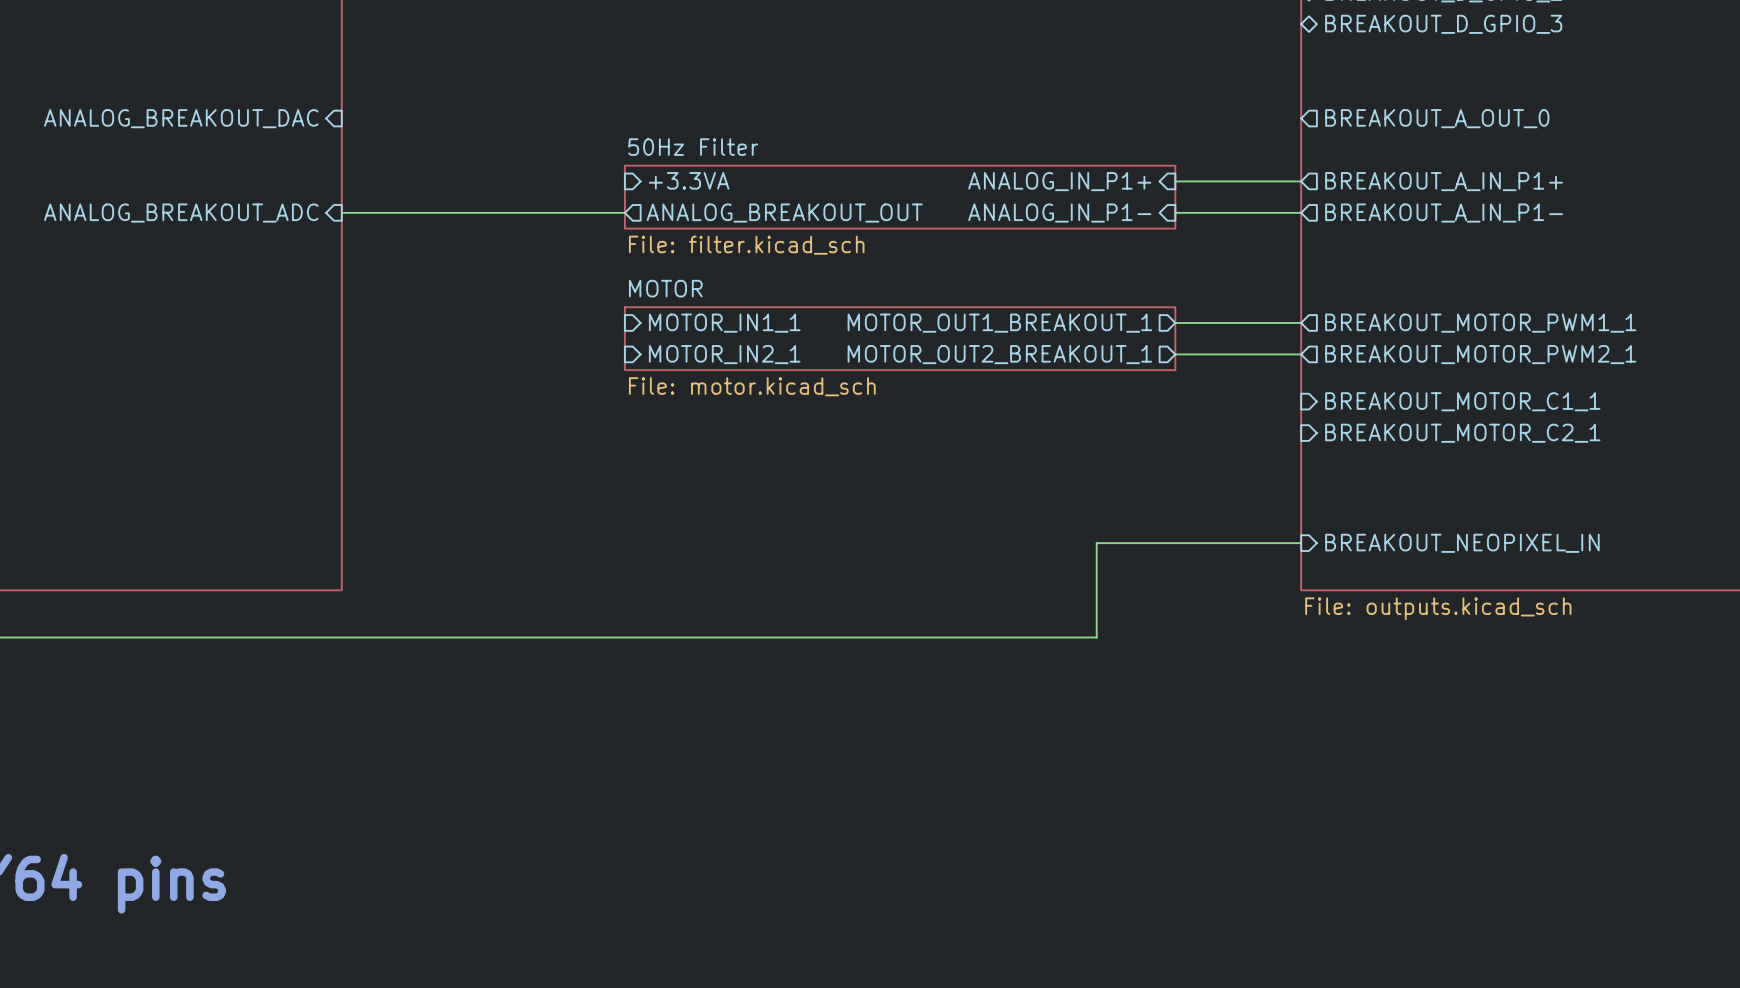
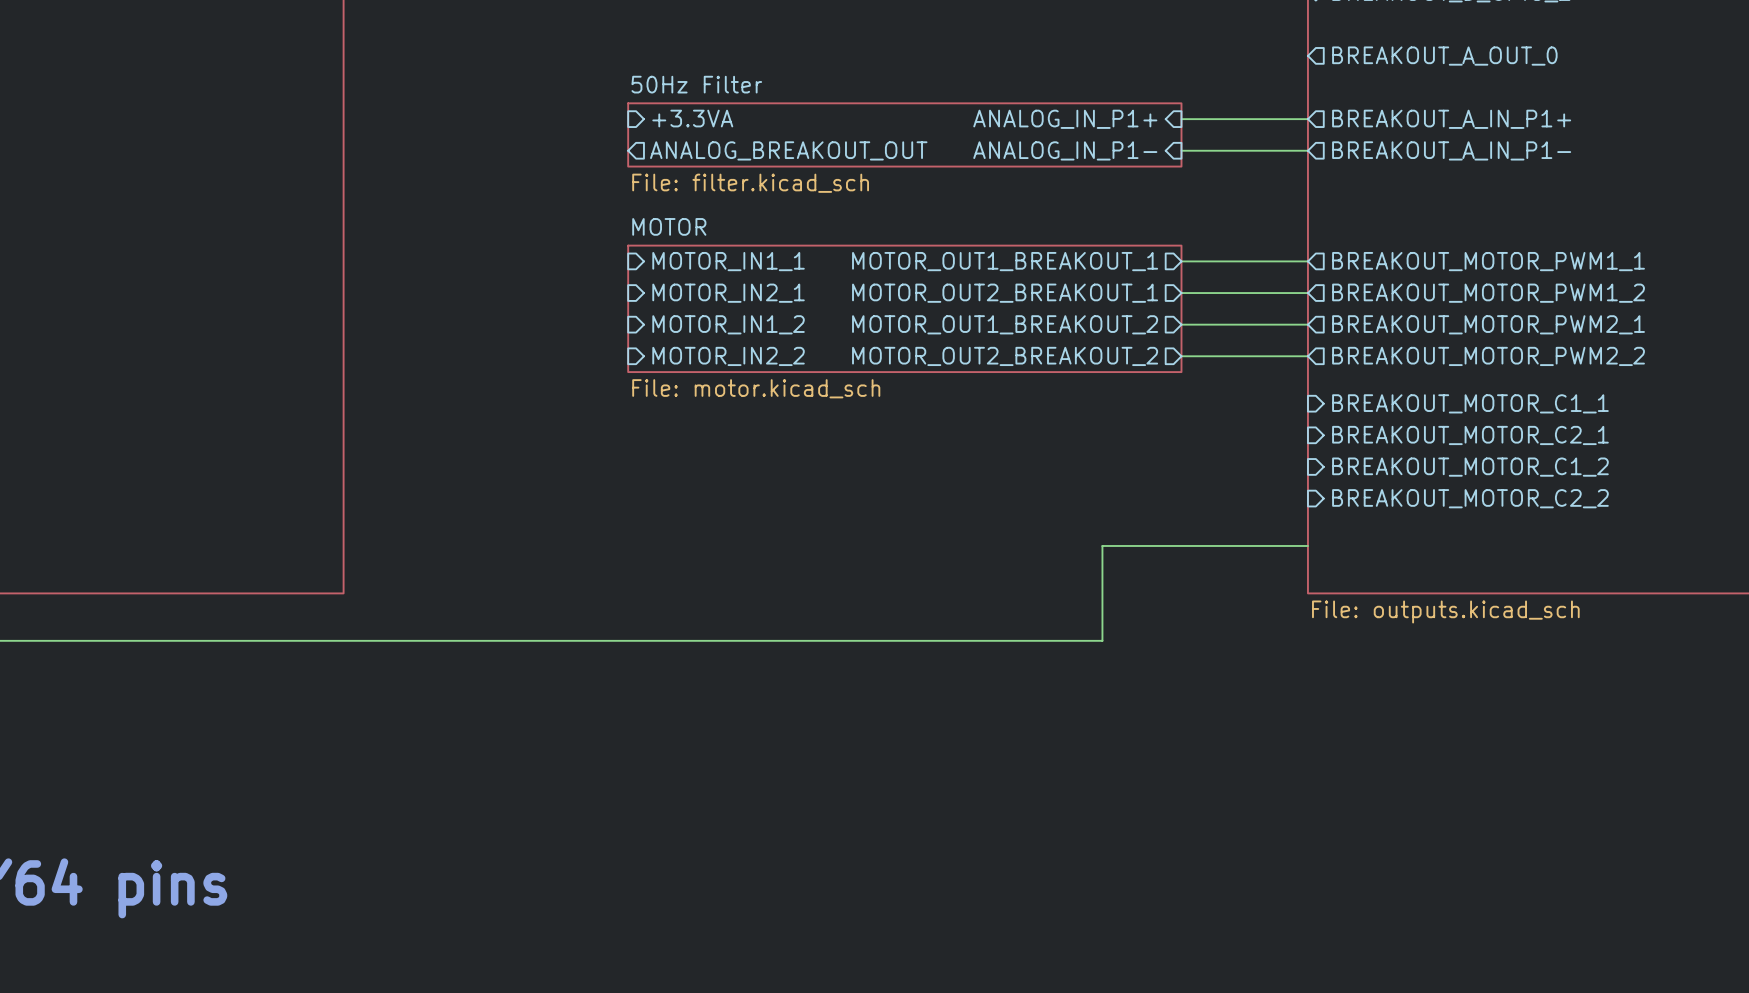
sheet pin shape: bidirectional (1443, 24) -> output (1444, 56)
sheet pin: BREAKOUT_D_GPIO_3 (1443, 24) -> BREAKOUT_A_OUT_0 (1444, 56)
sheet pin: ANALOG_BREAKOUT_DAC (181, 118) -> none
sheet pin: BREAKOUT_A_OUT_0 (1437, 118) -> BREAKOUT_A_IN_P1+ (1451, 119)
sheet pin position: +3.3VA (689, 180) -> +3.3VA (692, 118)
sheet pin position: ANALOG_IN_P1+ (1059, 181) -> ANALOG_IN_P1+ (1065, 119)
wire: (1175, 181) (1301, 181) -> (1181, 119) (1307, 119)
sheet pin: BREAKOUT_A_IN_P1+ (1444, 181) -> none
sheet 50Hz Filter position: (900, 197) -> (904, 134)
wire: (341, 212) (624, 212) -> none
wire: (1175, 212) (1301, 212) -> (1181, 150) (1307, 150)
sheet pin: ANALOG_BREAKOUT_ADC (181, 213) -> none
sheet pin position: ANALOG_BREAKOUT_OUT (784, 213) -> ANALOG_BREAKOUT_OUT (788, 150)
sheet pin position: ANALOG_IN_P1- (1059, 213) -> ANALOG_IN_P1- (1065, 150)
sheet pin position: BREAKOUT_A_IN_P1- (1444, 213) -> BREAKOUT_A_IN_P1- (1451, 150)
sheet pin: none -> MOTOR_IN1_1 (728, 261)
sheet pin: none -> MOTOR_OUT1_BREAKOUT_1 (1005, 261)
wire: none -> (1181, 261) (1307, 261)
sheet pin: none -> BREAKOUT_MOTOR_PWM1_1 (1488, 261)
sheet pin: none -> MOTOR_IN2_1 (728, 293)
sheet pin: none -> MOTOR_OUT2_BREAKOUT_1 (1005, 293)
wire: none -> (1181, 293) (1307, 293)
sheet pin: none -> BREAKOUT_MOTOR_PWM1_2 (1488, 293)
sheet MOTOR: none -> File: motor.kicad_sch (904, 308)
sheet pin: MOTOR_IN1_1 (724, 323) -> MOTOR_IN1_2 (728, 324)
sheet pin: MOTOR_OUT1_BREAKOUT_1 (999, 323) -> MOTOR_OUT1_BREAKOUT_2 (1005, 324)
sheet pin: BREAKOUT_MOTOR_PWM1_1 (1480, 323) -> BREAKOUT_MOTOR_PWM2_1 (1488, 324)
sheet MOTOR: File: motor.kicad_sch (900, 338) -> none
sheet pin: MOTOR_IN2_1 (724, 354) -> MOTOR_IN2_2 (728, 356)
sheet pin: MOTOR_OUT2_BREAKOUT_1 (999, 354) -> MOTOR_OUT2_BREAKOUT_2 (1005, 356)
sheet pin: BREAKOUT_MOTOR_PWM2_1 (1480, 354) -> BREAKOUT_MOTOR_PWM2_2 (1488, 356)
sheet pin: none -> BREAKOUT_MOTOR_C1_2 (1470, 467)
sheet pin: none -> BREAKOUT_MOTOR_C2_2 (1470, 498)
sheet pin: BREAKOUT_NEOPIXEL_IN (1462, 543) -> none

